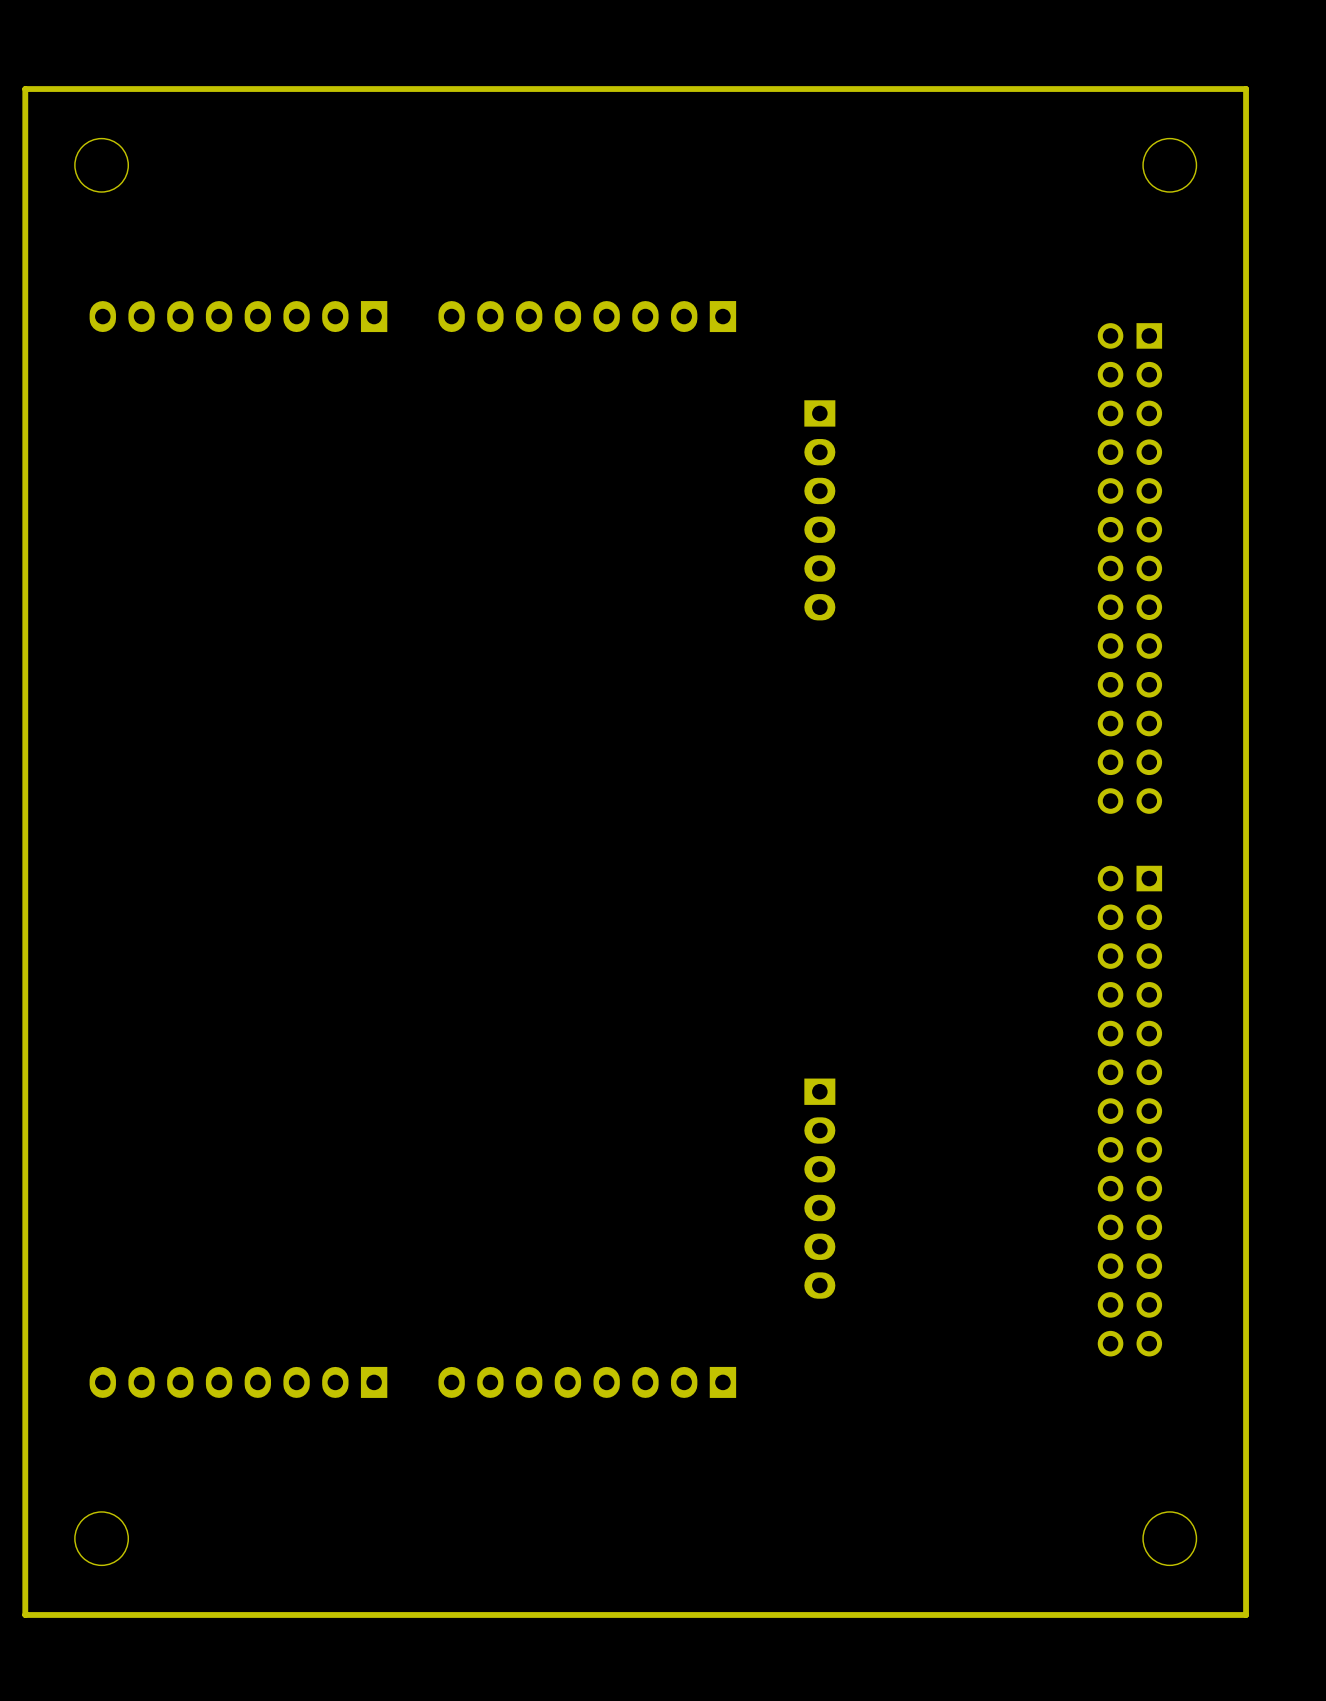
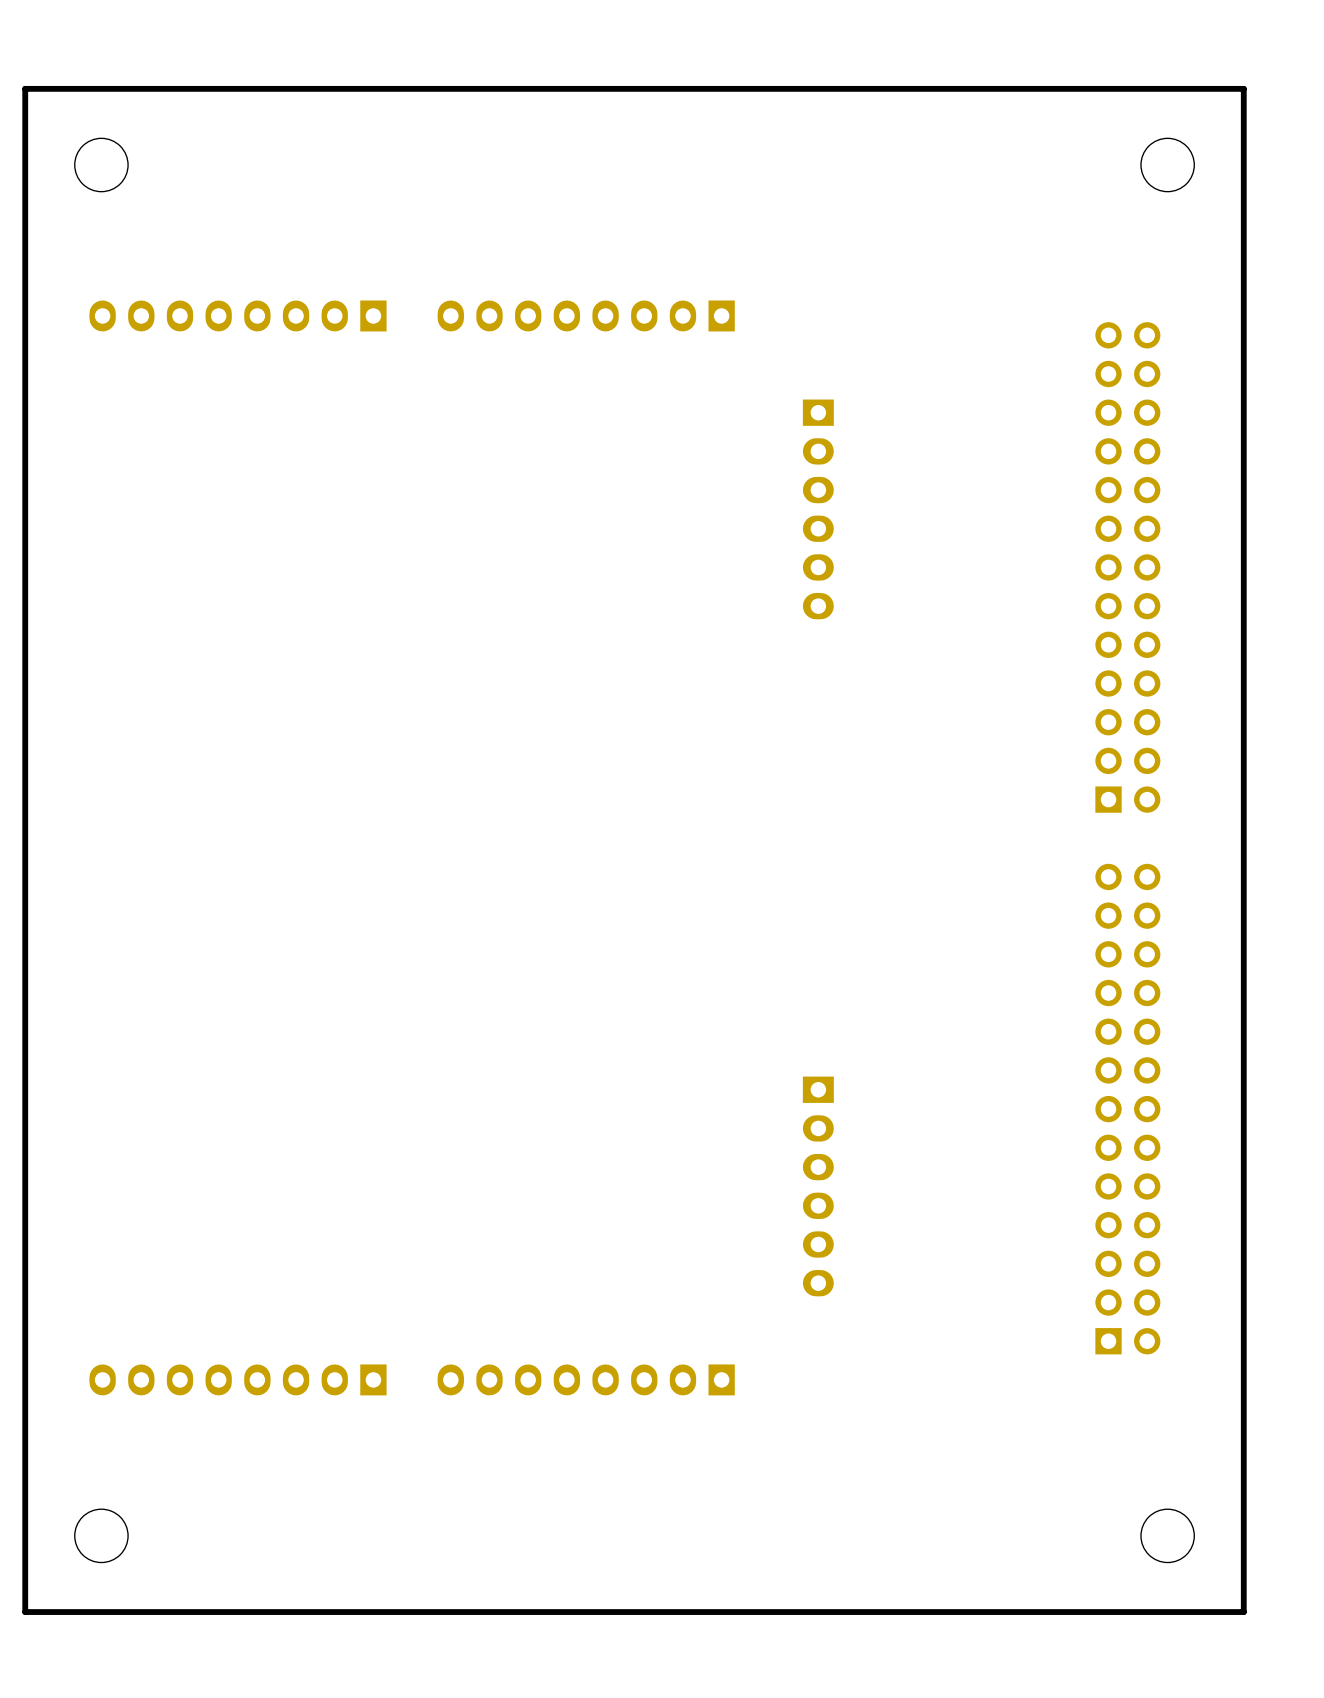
part footprint: [1097, 323, 1163, 814] -> [1095, 322, 1161, 813]
part footprint: [1097, 865, 1163, 1357] -> [1095, 863, 1161, 1355]

